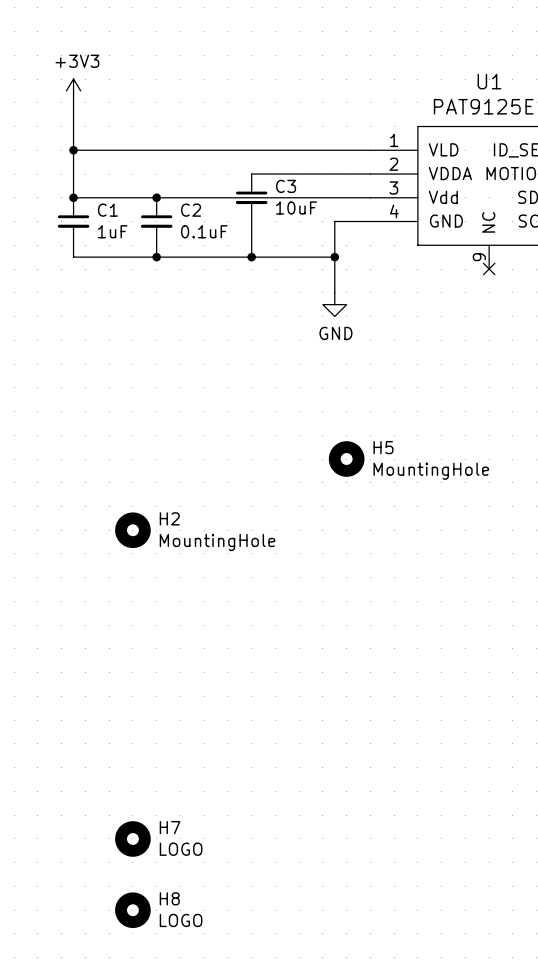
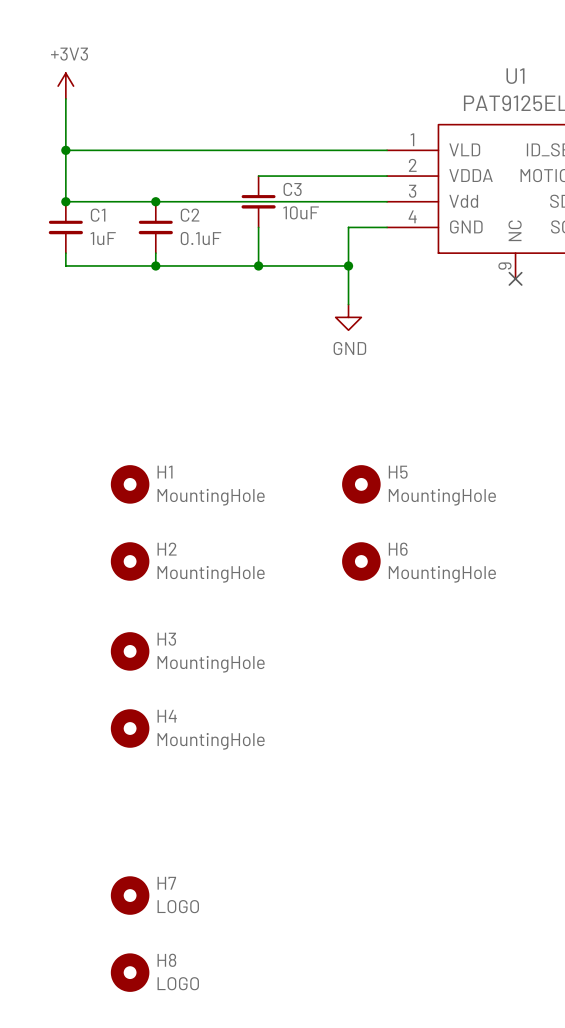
H1: none -> MountingHole (130, 484)
H6: none -> MountingHole (361, 561)
H3: none -> MountingHole (130, 651)
H4: none -> MountingHole (130, 728)

